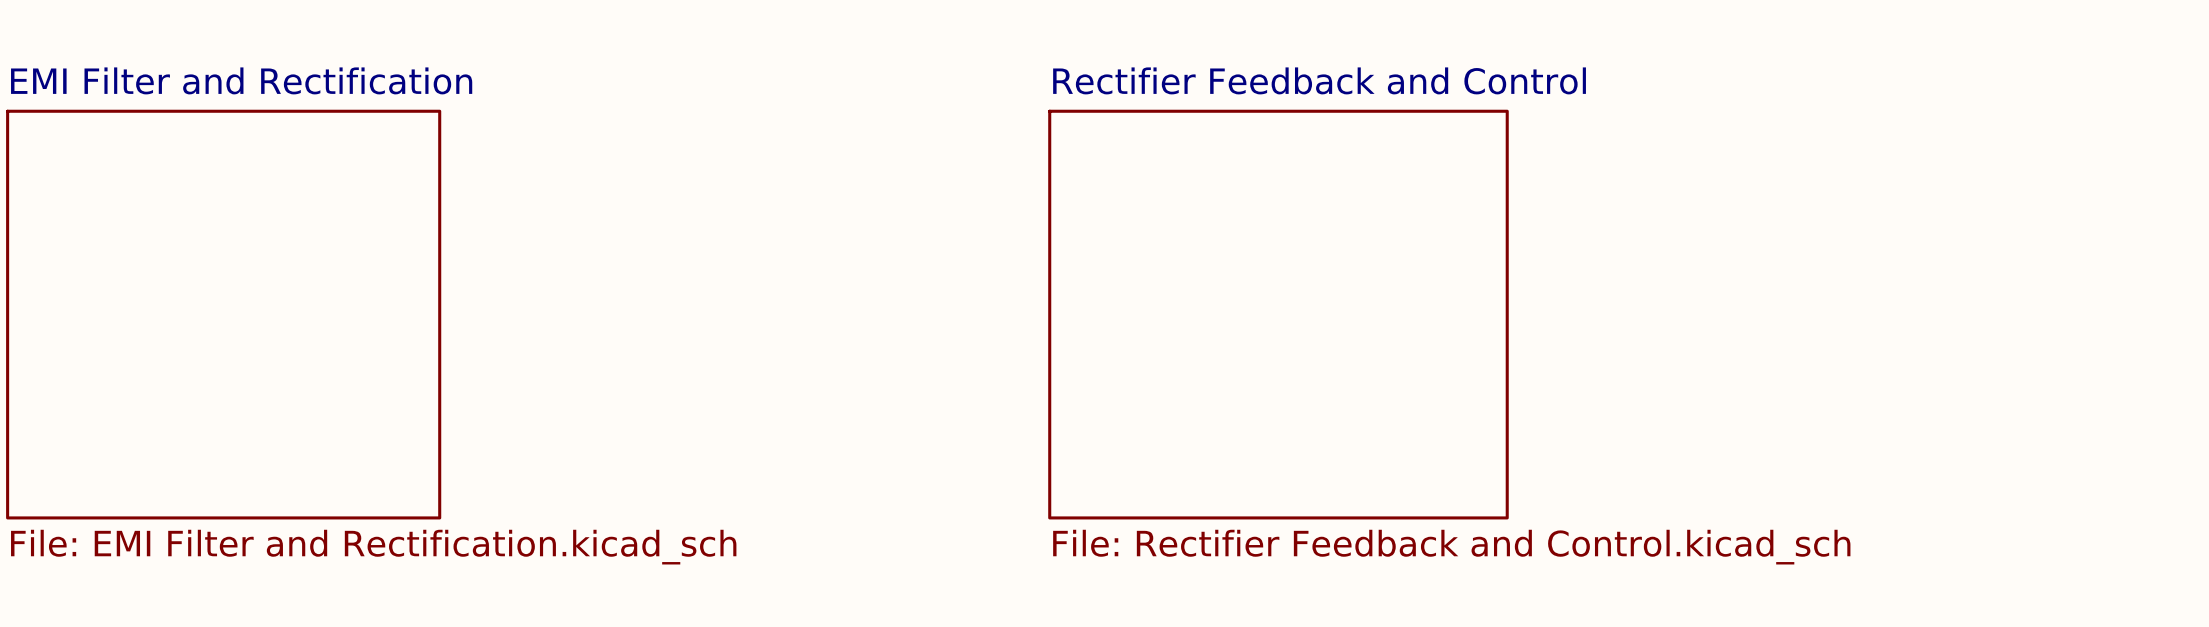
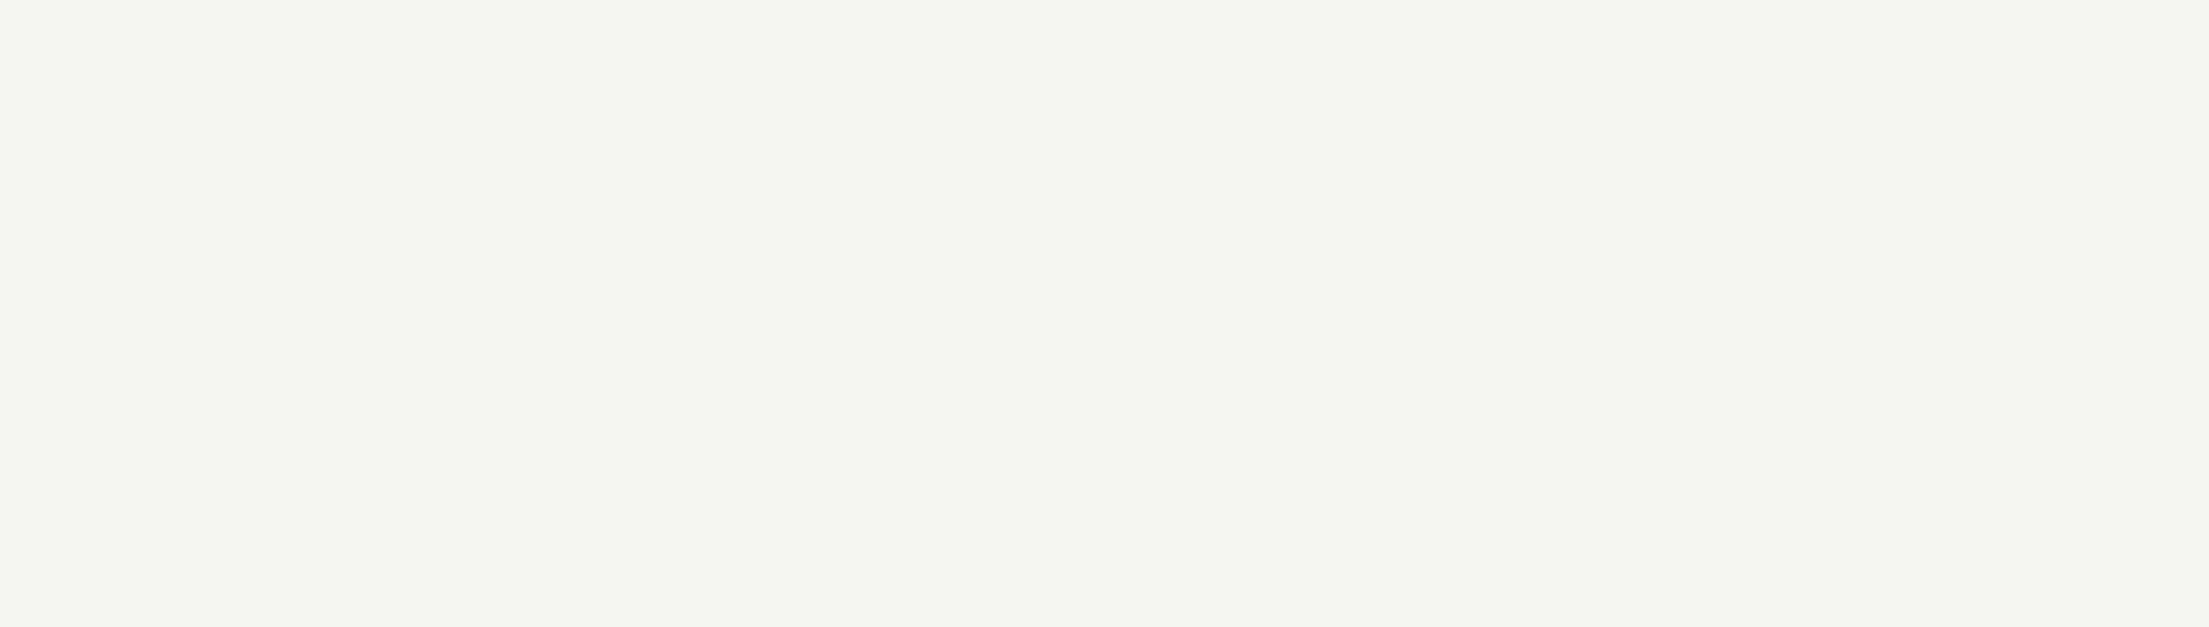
sheet EMI Filter and Rectification: File: EMI Filter and Rectification.kicad_sch (223, 314) -> none
sheet Rectifier Feedback and Control: File: Rectifier Feedback and Control.kicad_sch (1278, 314) -> none

